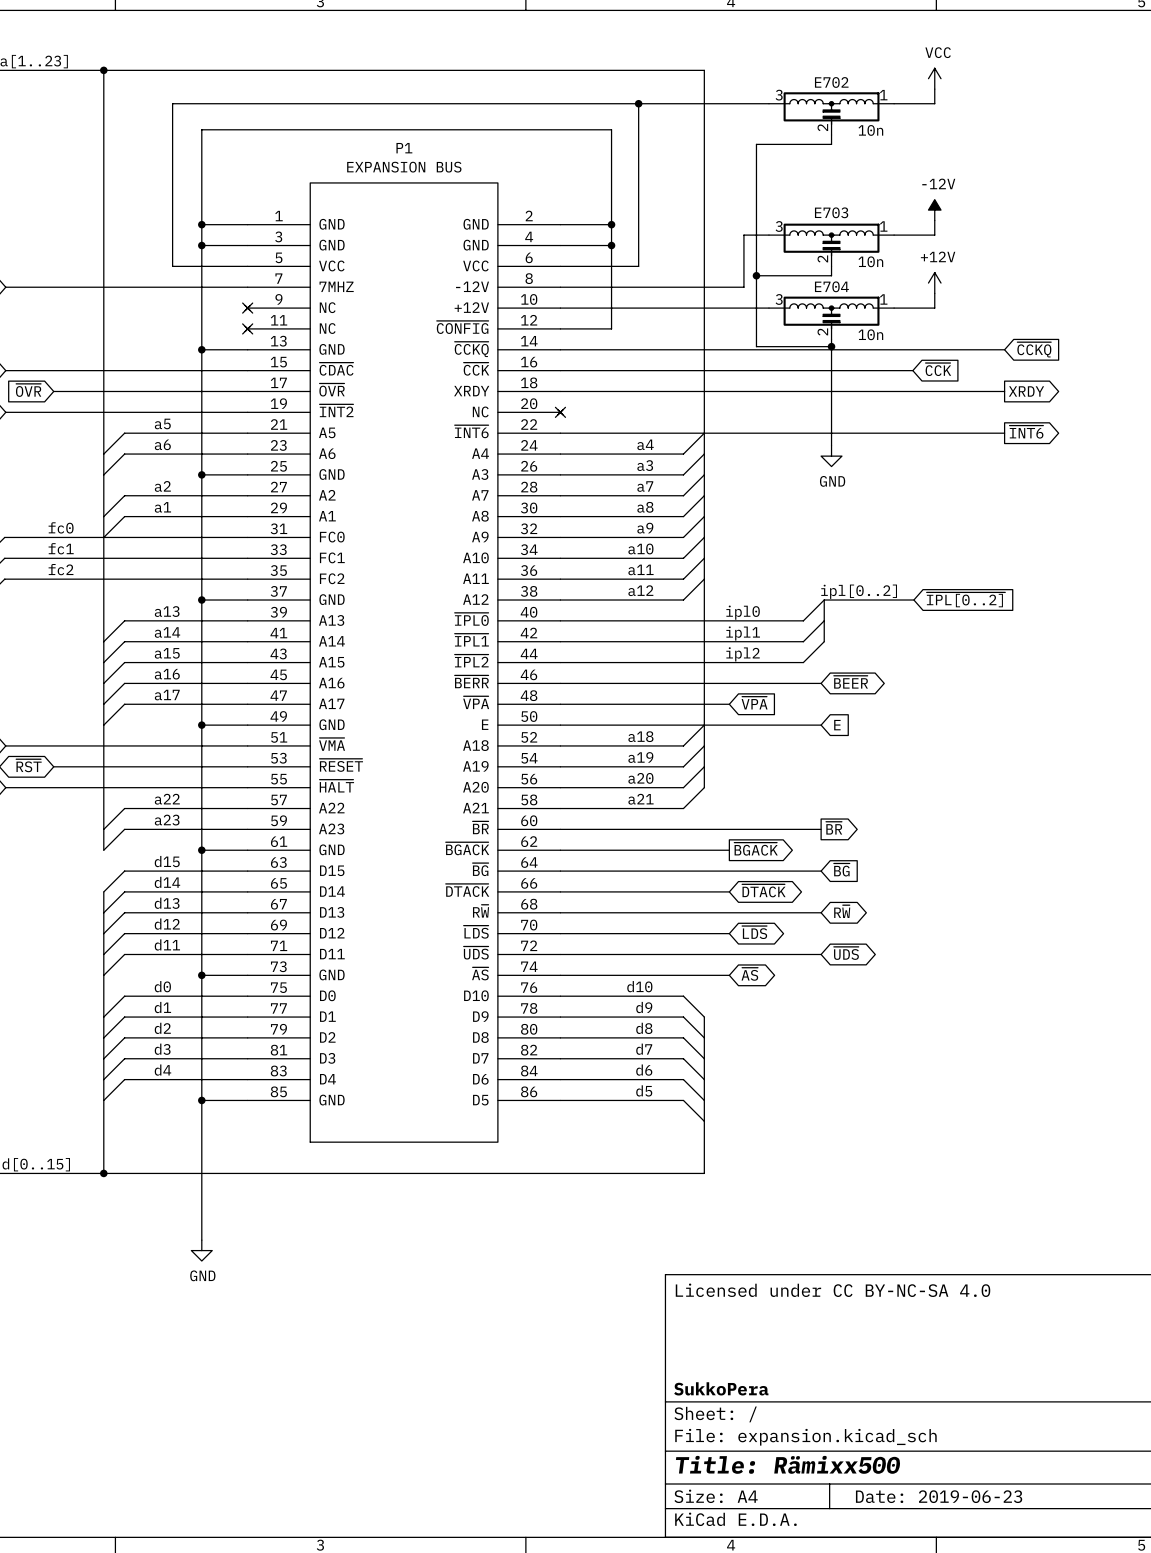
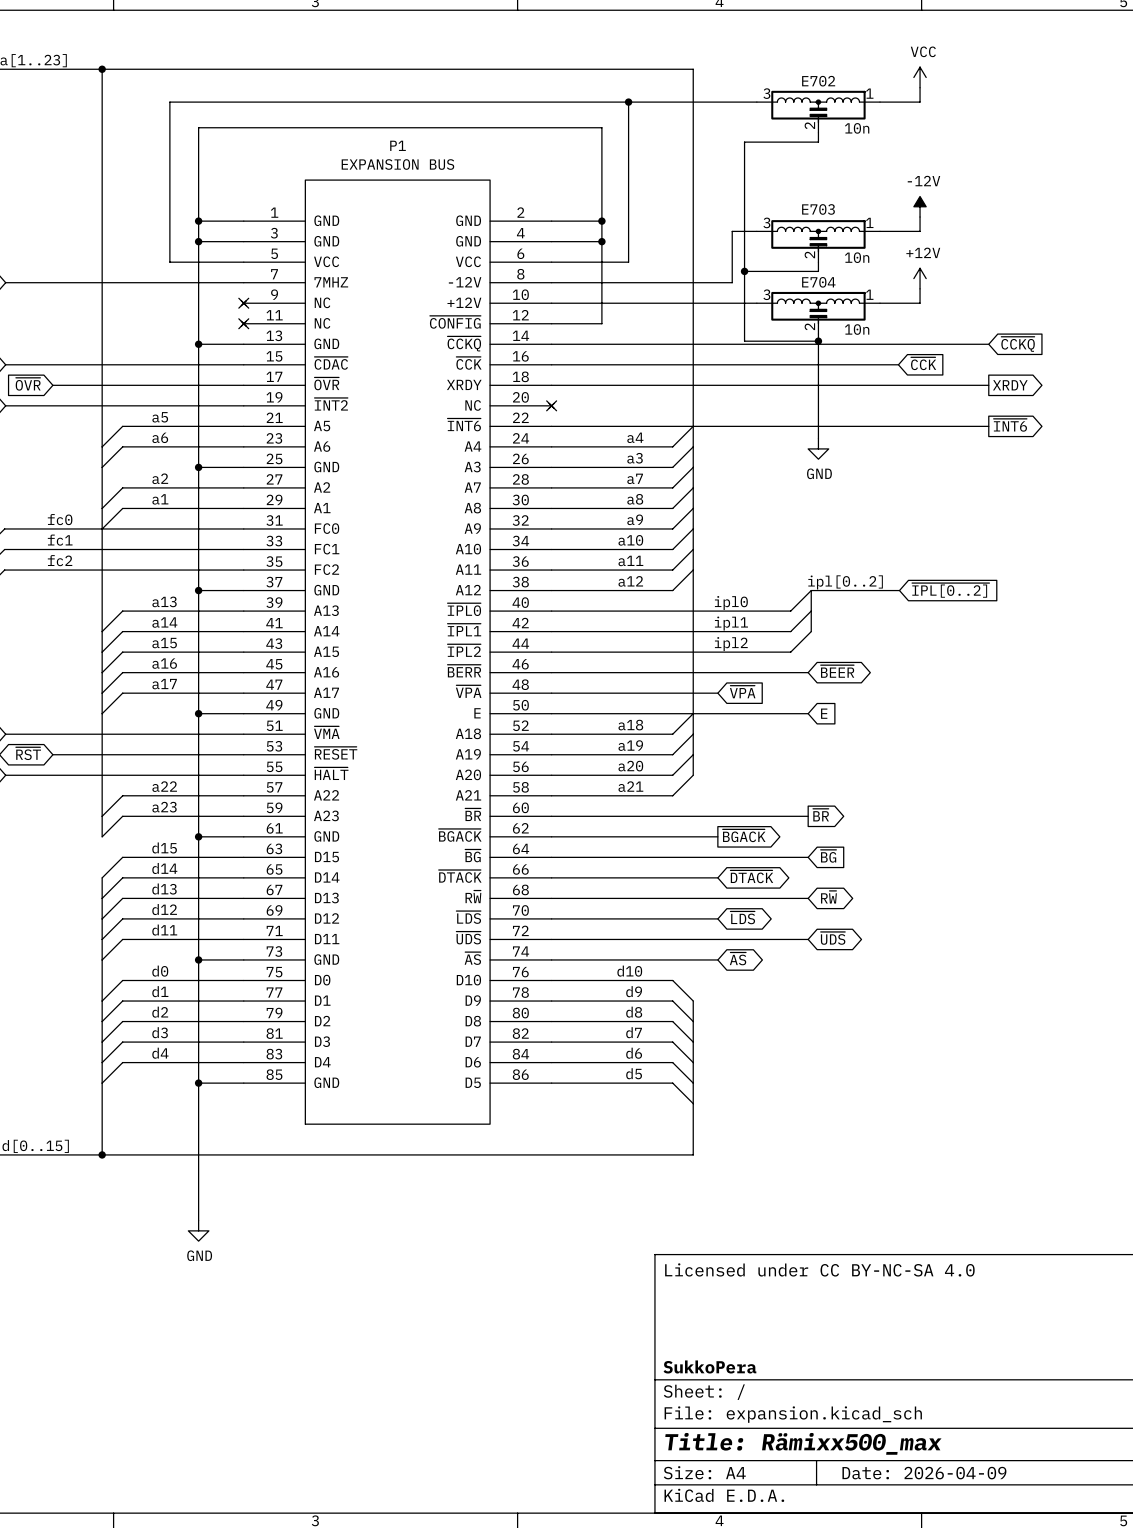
title block: Title: Rämixx500 (788, 1464) -> Title: Rämixx500_max (803, 1443)
title block: Date: 2019-06-23 (939, 1496) -> Date: 2026-04-09 (924, 1473)

